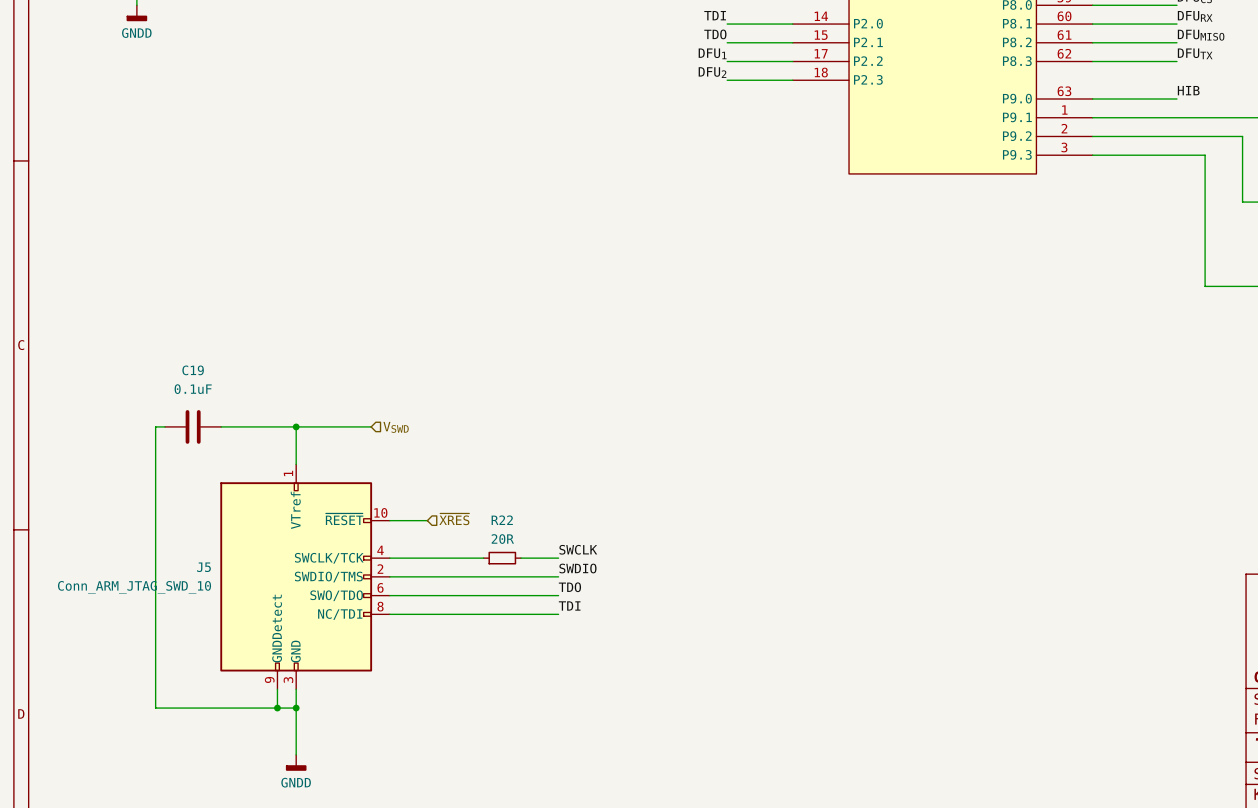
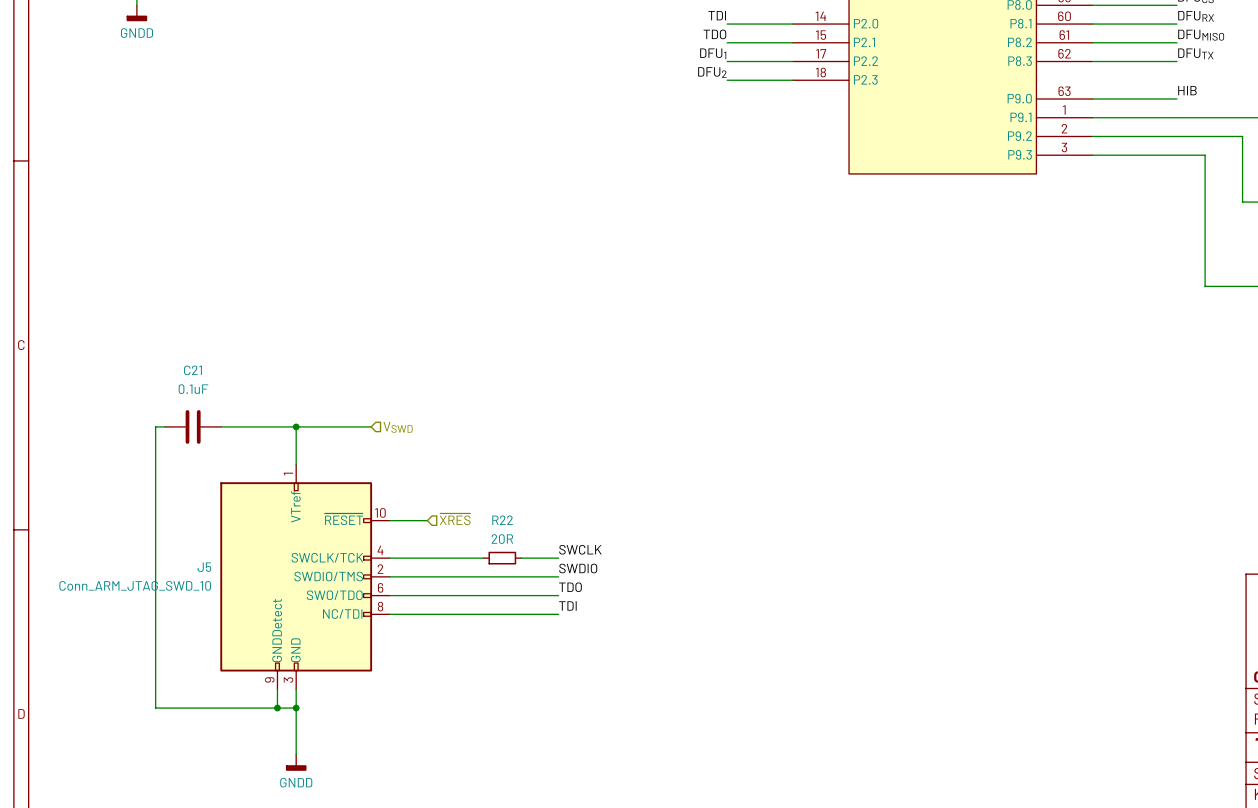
C19 name: C19 (193, 370) -> C21 (192, 370)

